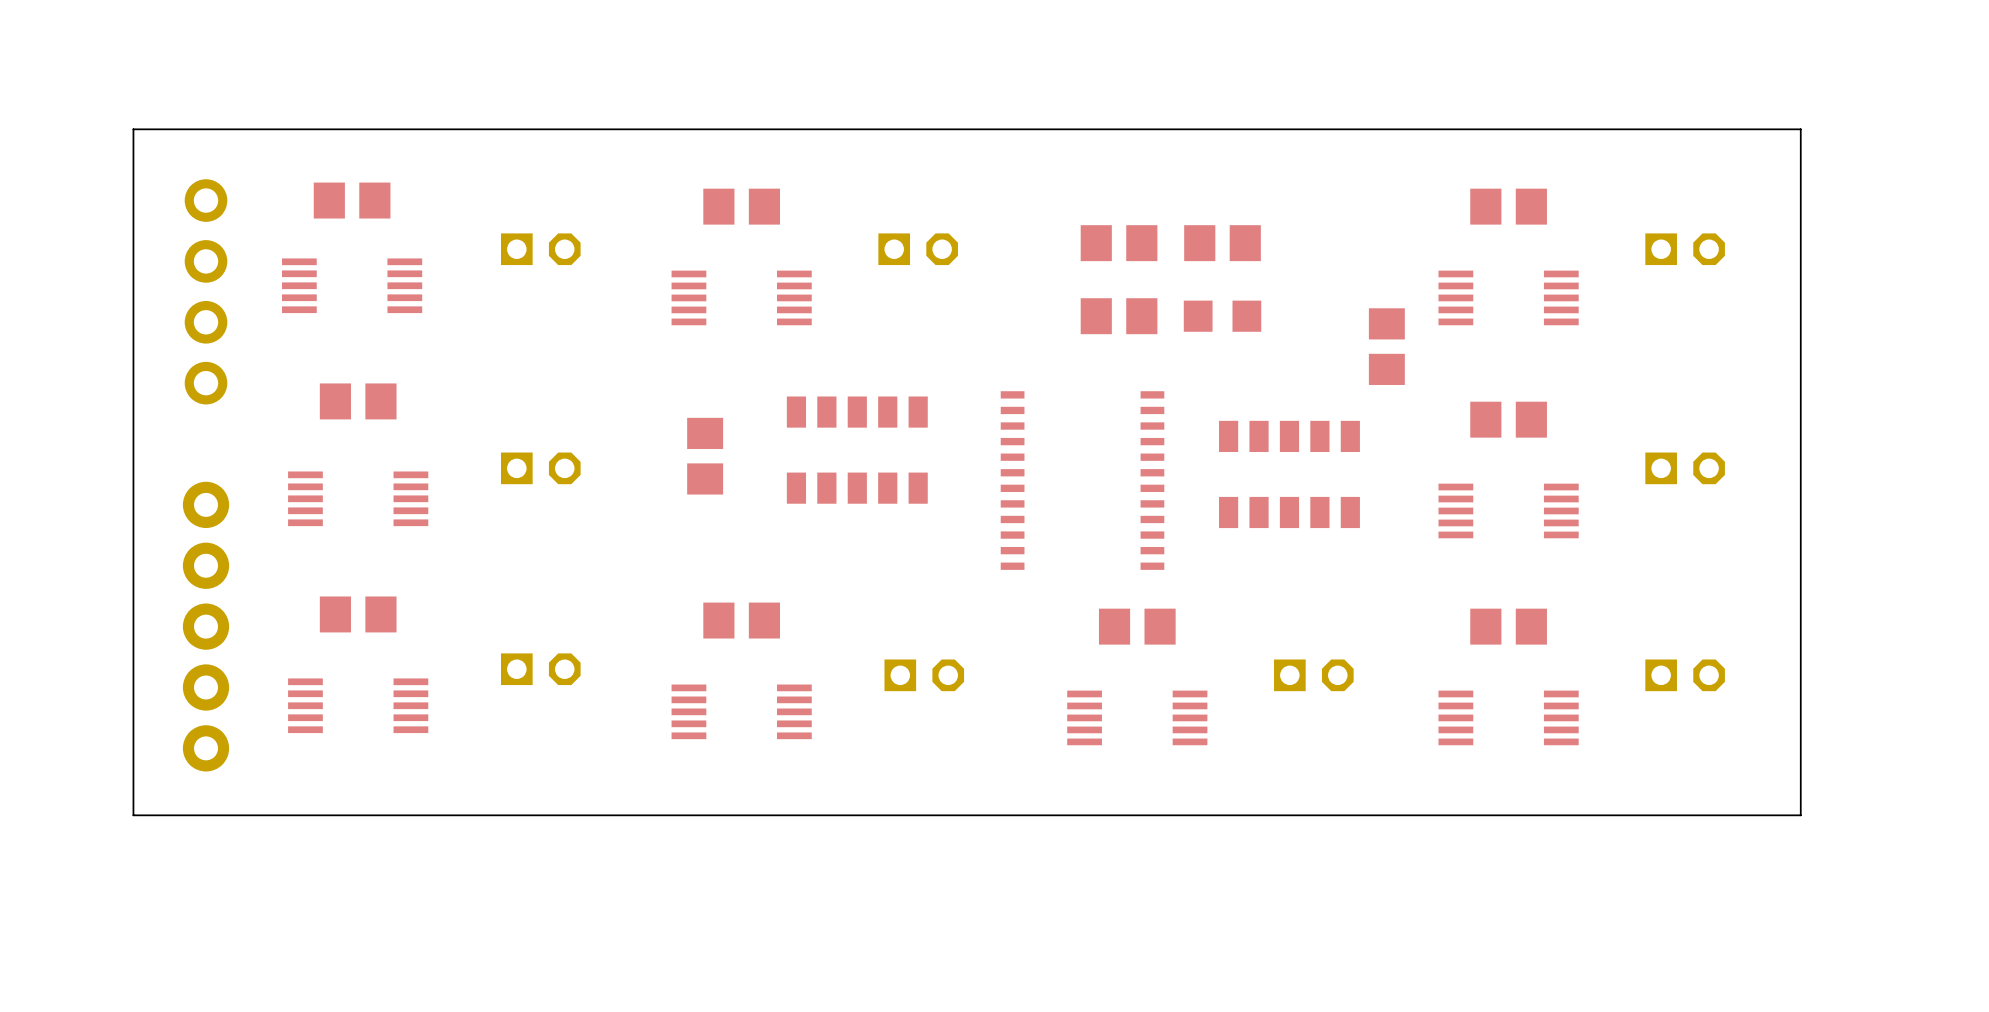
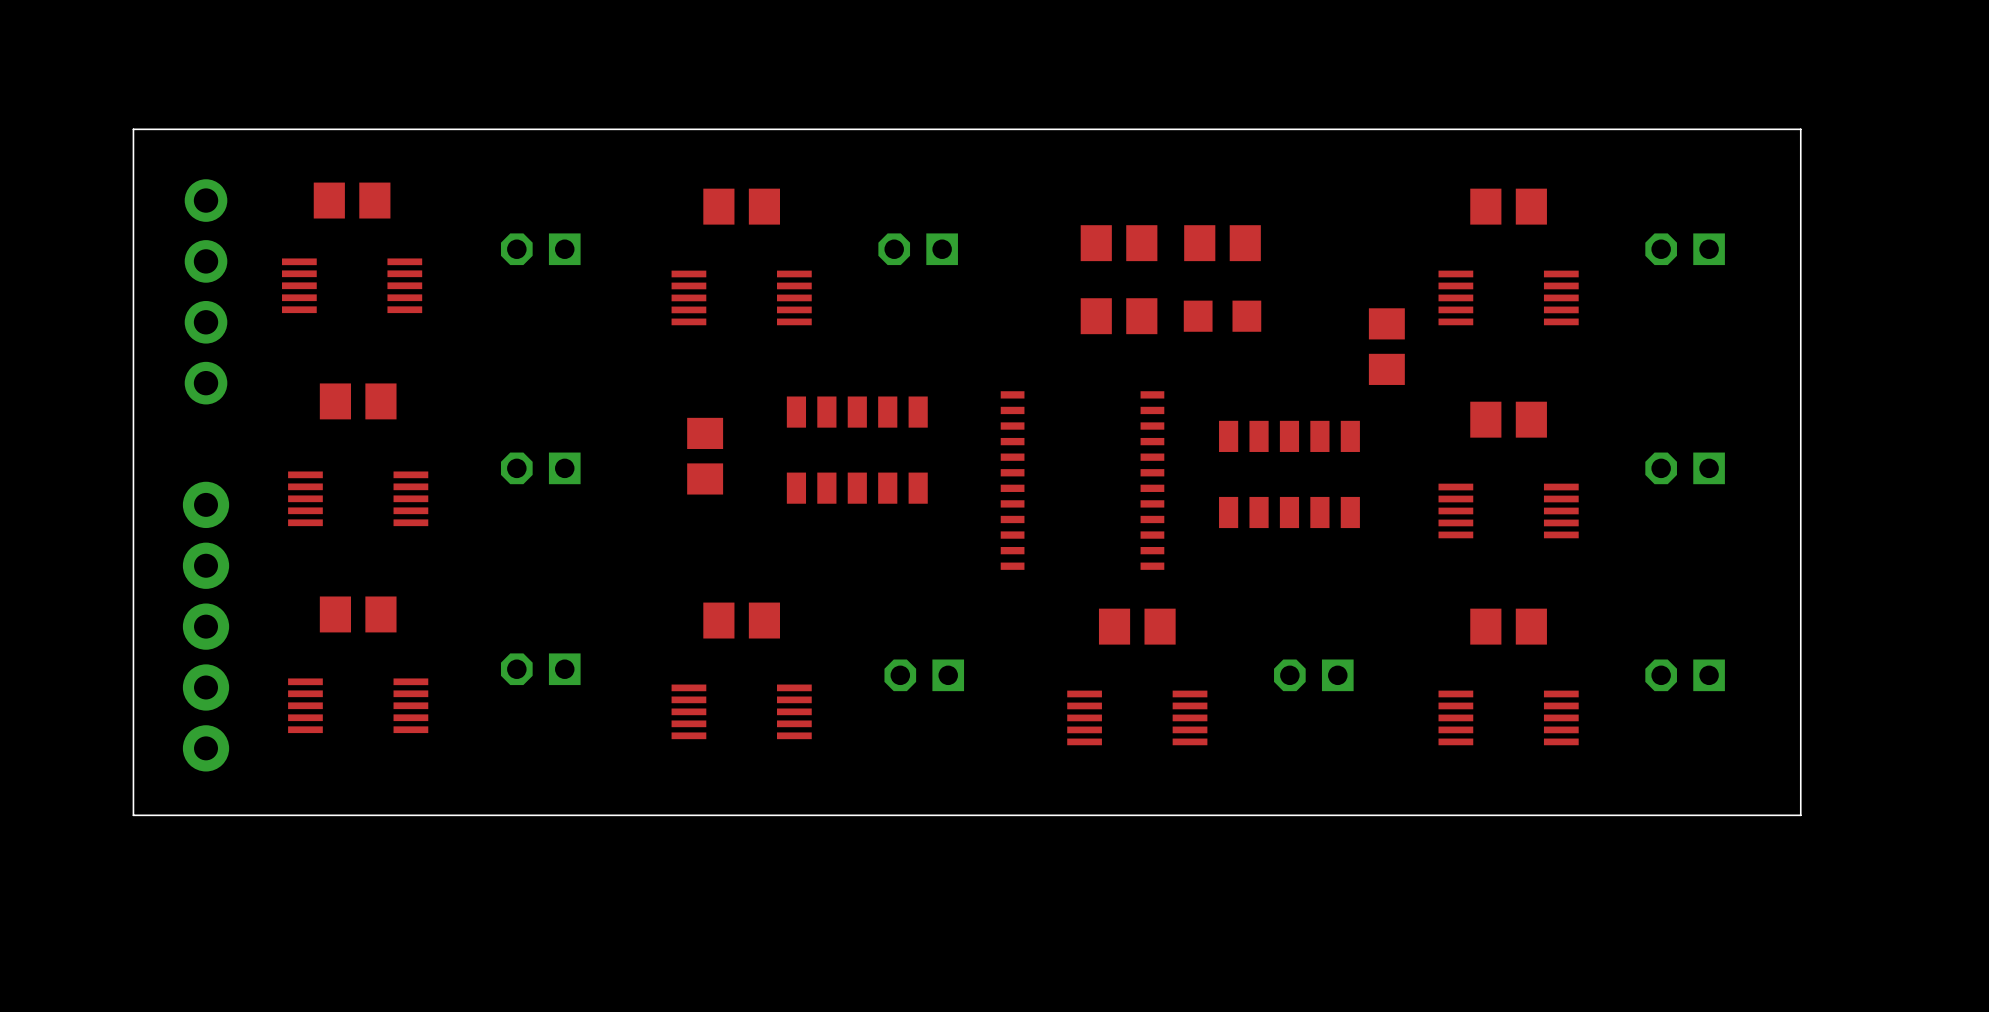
part rotation: 0° (540, 249) -> 180° (540, 249)
part rotation: 0° (918, 249) -> 180° (918, 249)
part rotation: 0° (1685, 249) -> 180° (1685, 249)
part rotation: 0° (540, 468) -> 180° (540, 468)
part rotation: 0° (1685, 468) -> 180° (1685, 468)
part rotation: 0° (540, 669) -> 180° (540, 669)
part rotation: 0° (924, 675) -> 180° (924, 675)
part rotation: 0° (1313, 675) -> 180° (1313, 675)
part rotation: 0° (1685, 675) -> 180° (1685, 675)

